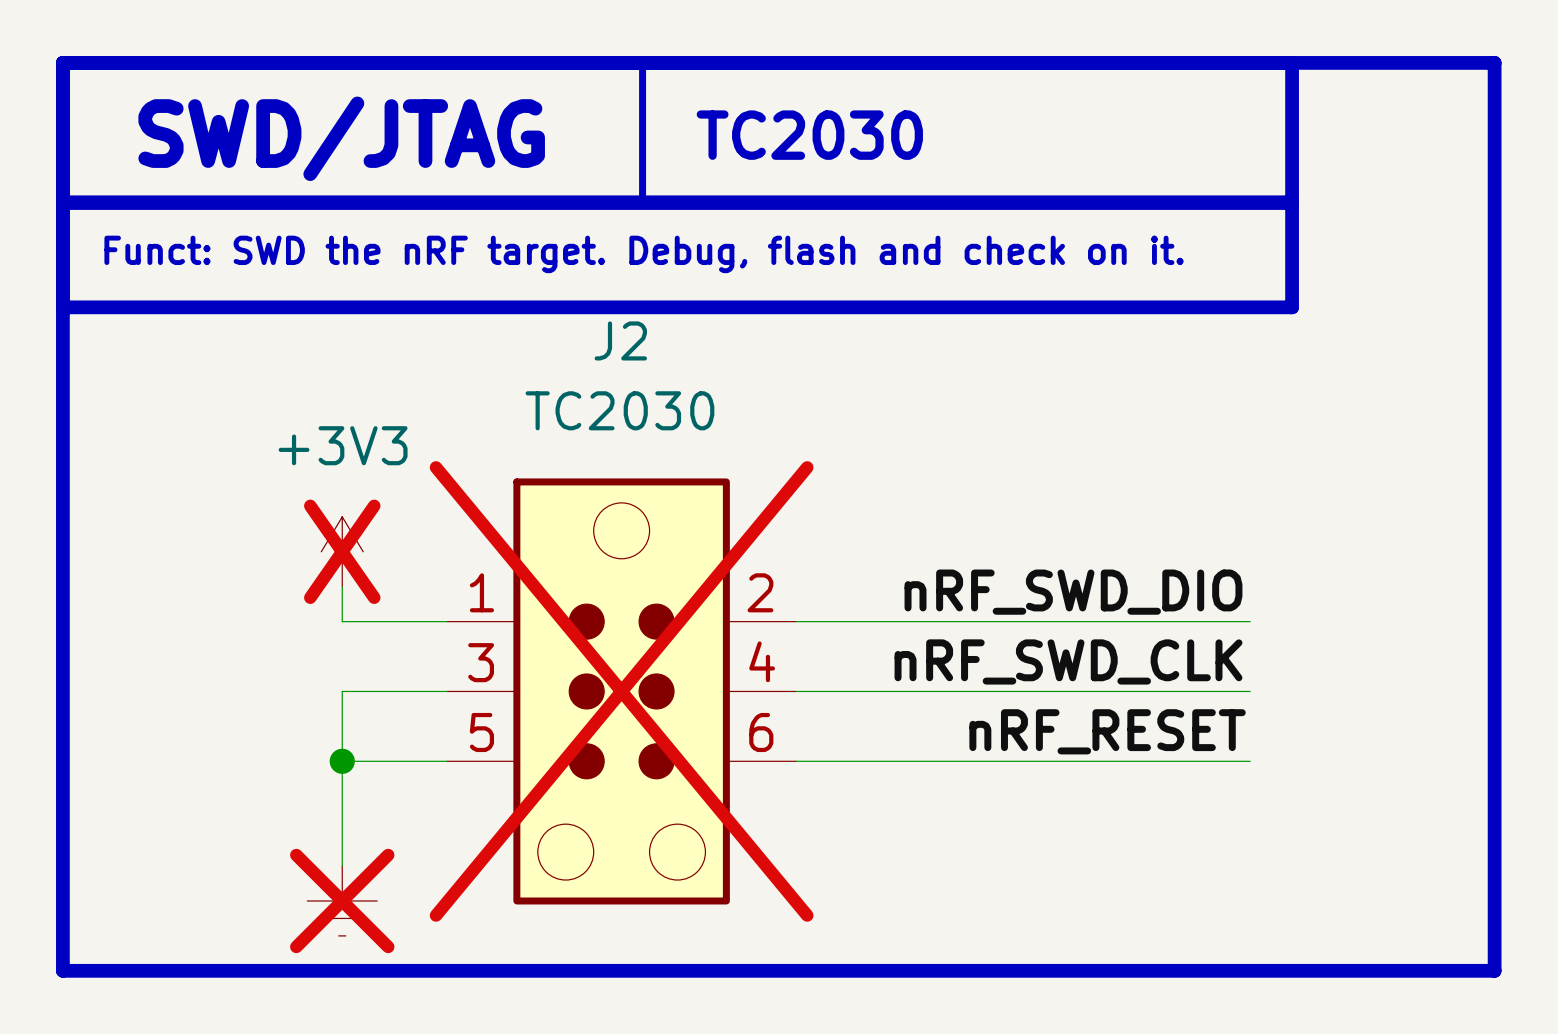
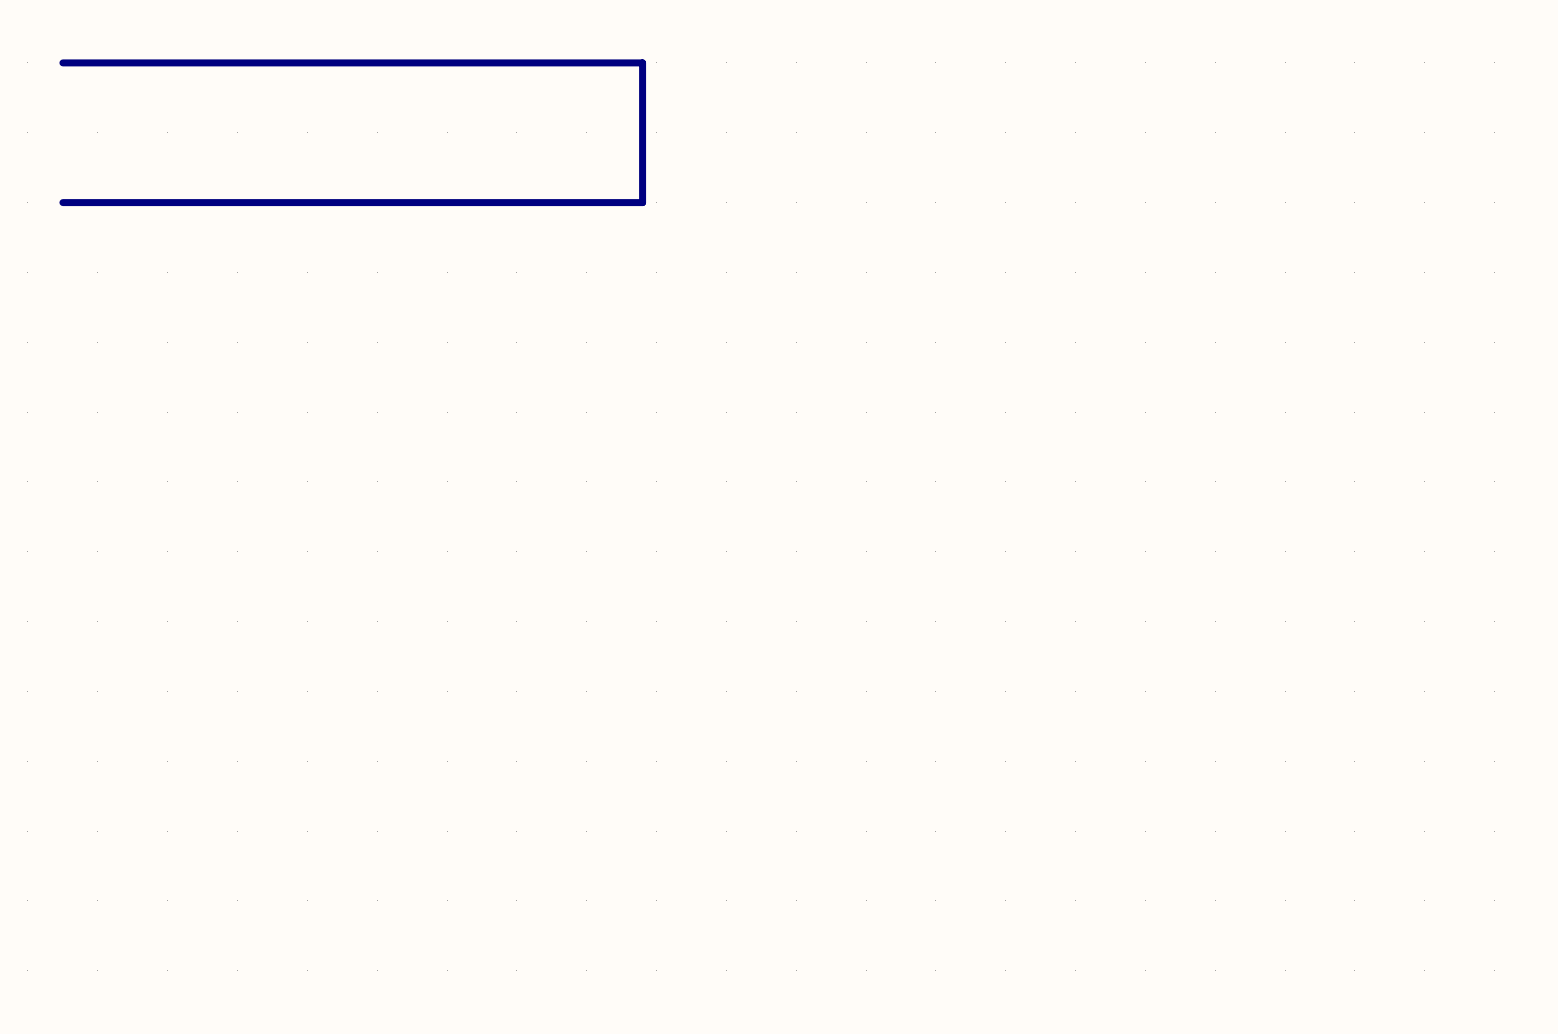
line: (62, 62) (1494, 62) (1494, 970) (62, 970) (62, 62) -> none
line: (62, 62) (62, 202) (1292, 202) -> none
line: (1292, 62) (1292, 307) (62, 307) -> none
text: TC2030 (809, 135) -> none
text: SWD/JTAG (341, 138) -> none
text: Funct: SWD the nRF target. Debug, flash and check on it. (644, 254) -> none
power symbol: +3V3 (342, 551) -> none
wire: (342, 586) (342, 621) (447, 621) -> none
label: nRF_SWD_DIO (1073, 592) -> none
wire: (796, 621) (1250, 621) -> none
label: nRF_SWD_CLK (1068, 661) -> none
wire: (447, 691) (342, 691) (342, 866) -> none
J2: TC2030 (621, 691) -> none
wire: (796, 691) (1250, 691) -> none
label: nRF_RESET (1107, 731) -> none
wire: (342, 761) (447, 761) -> none
junction: (342, 761) -> none
wire: (796, 761) (1250, 761) -> none
power symbol: (342, 900) -> none

